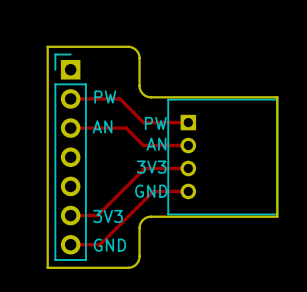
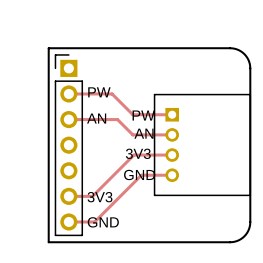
board edge: (128, 46) (135, 49) (138, 54) (139, 88) (147, 96) (277, 97) -> (119, 48) (236, 49) (244, 54) (249, 61) (250, 92)
board edge: (277, 216) (147, 217) (139, 225) (138, 260) (135, 265) (128, 267) -> (250, 197) (249, 228) (244, 236) (236, 241) (119, 242)

